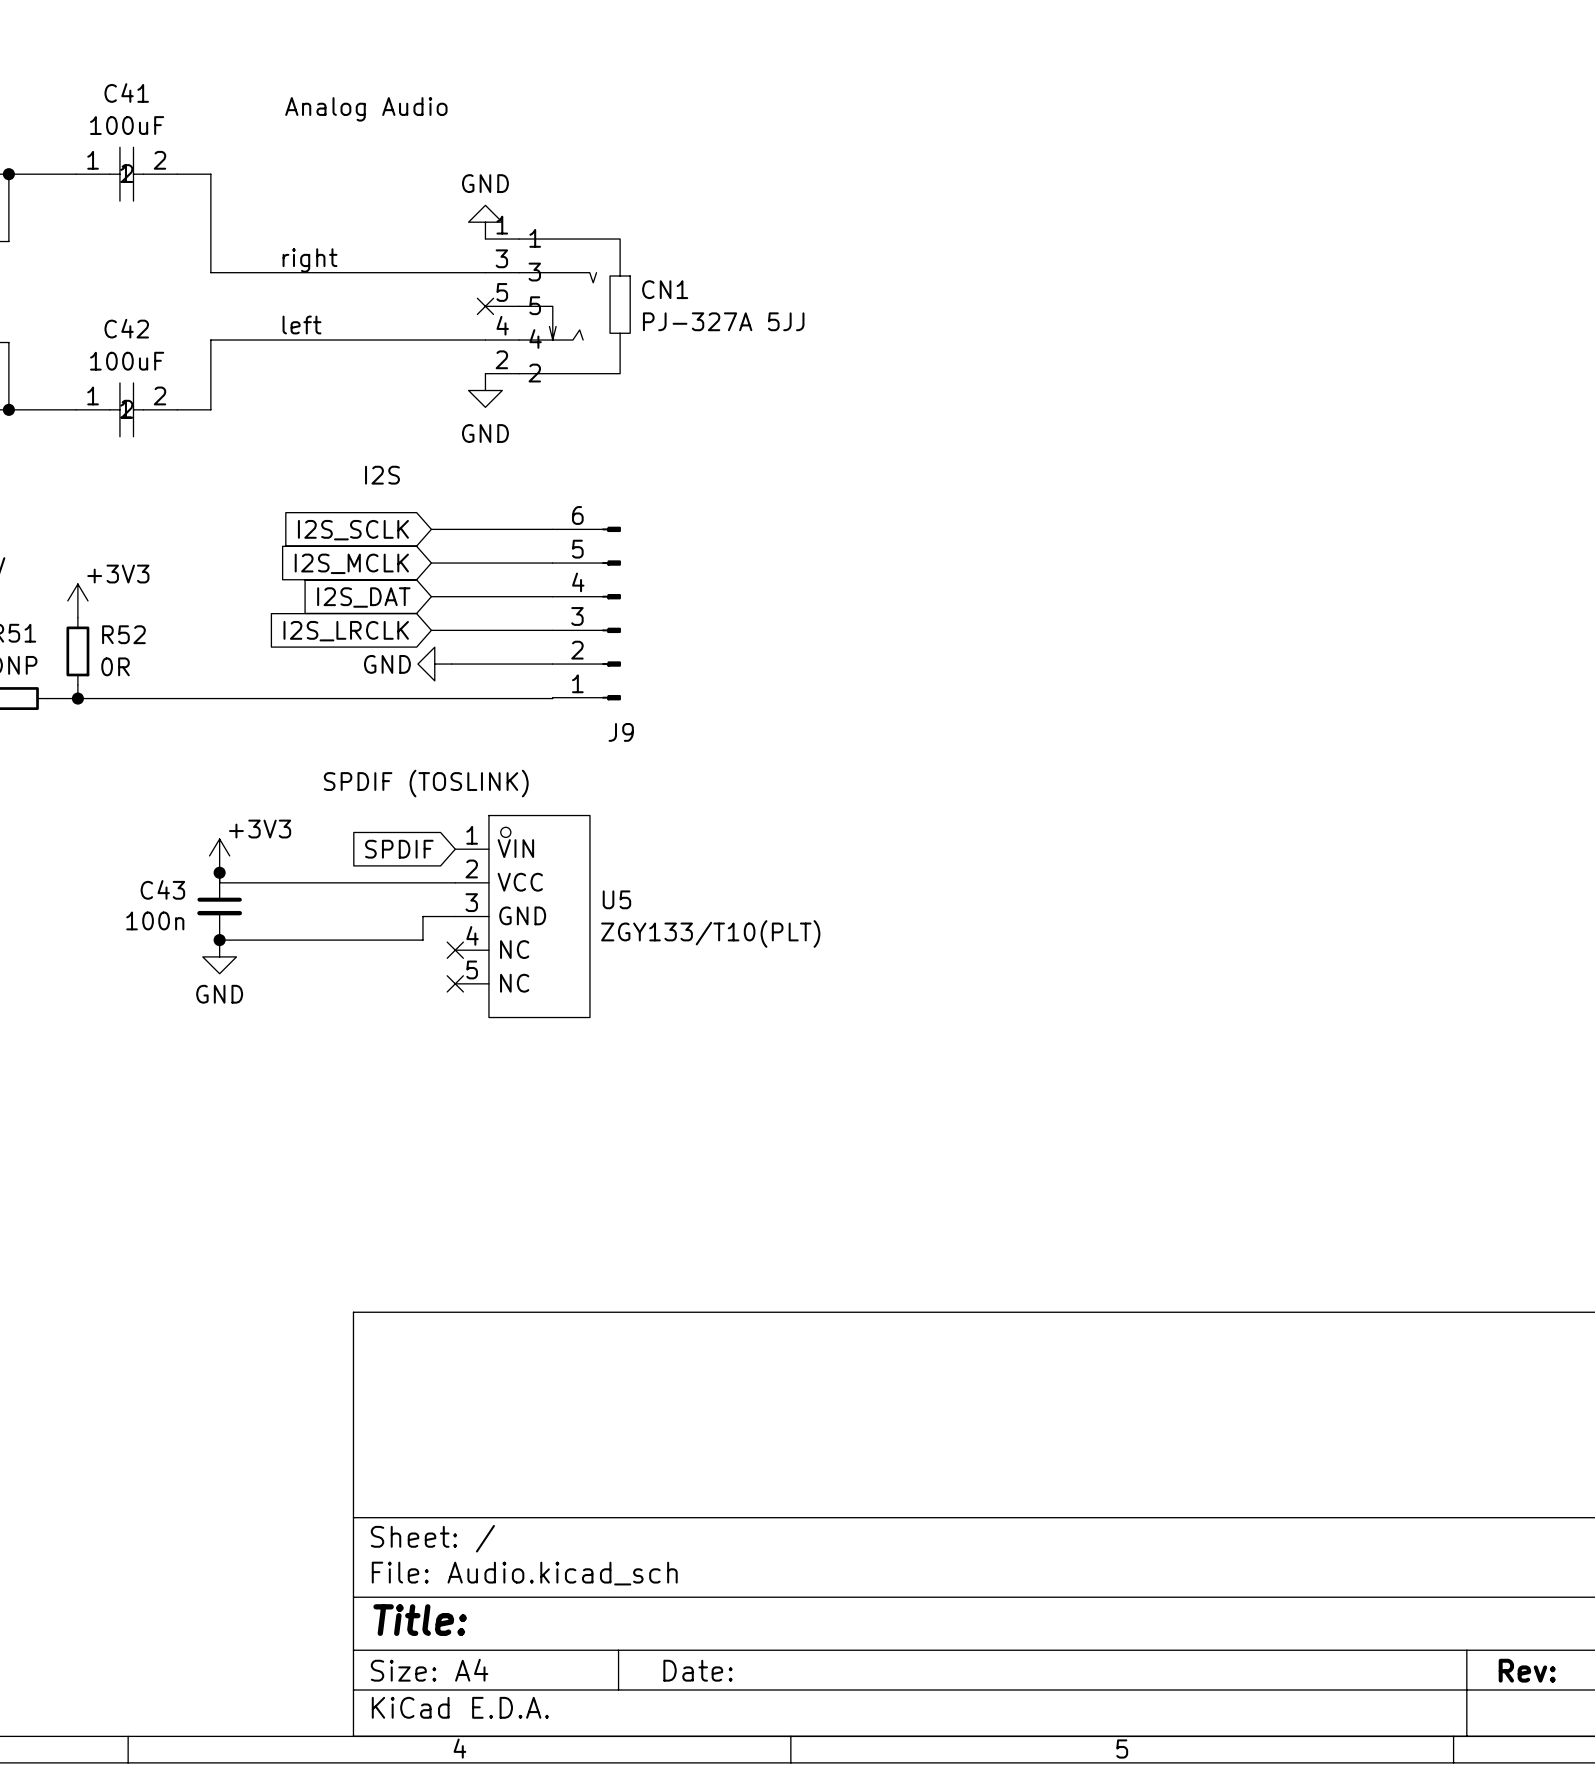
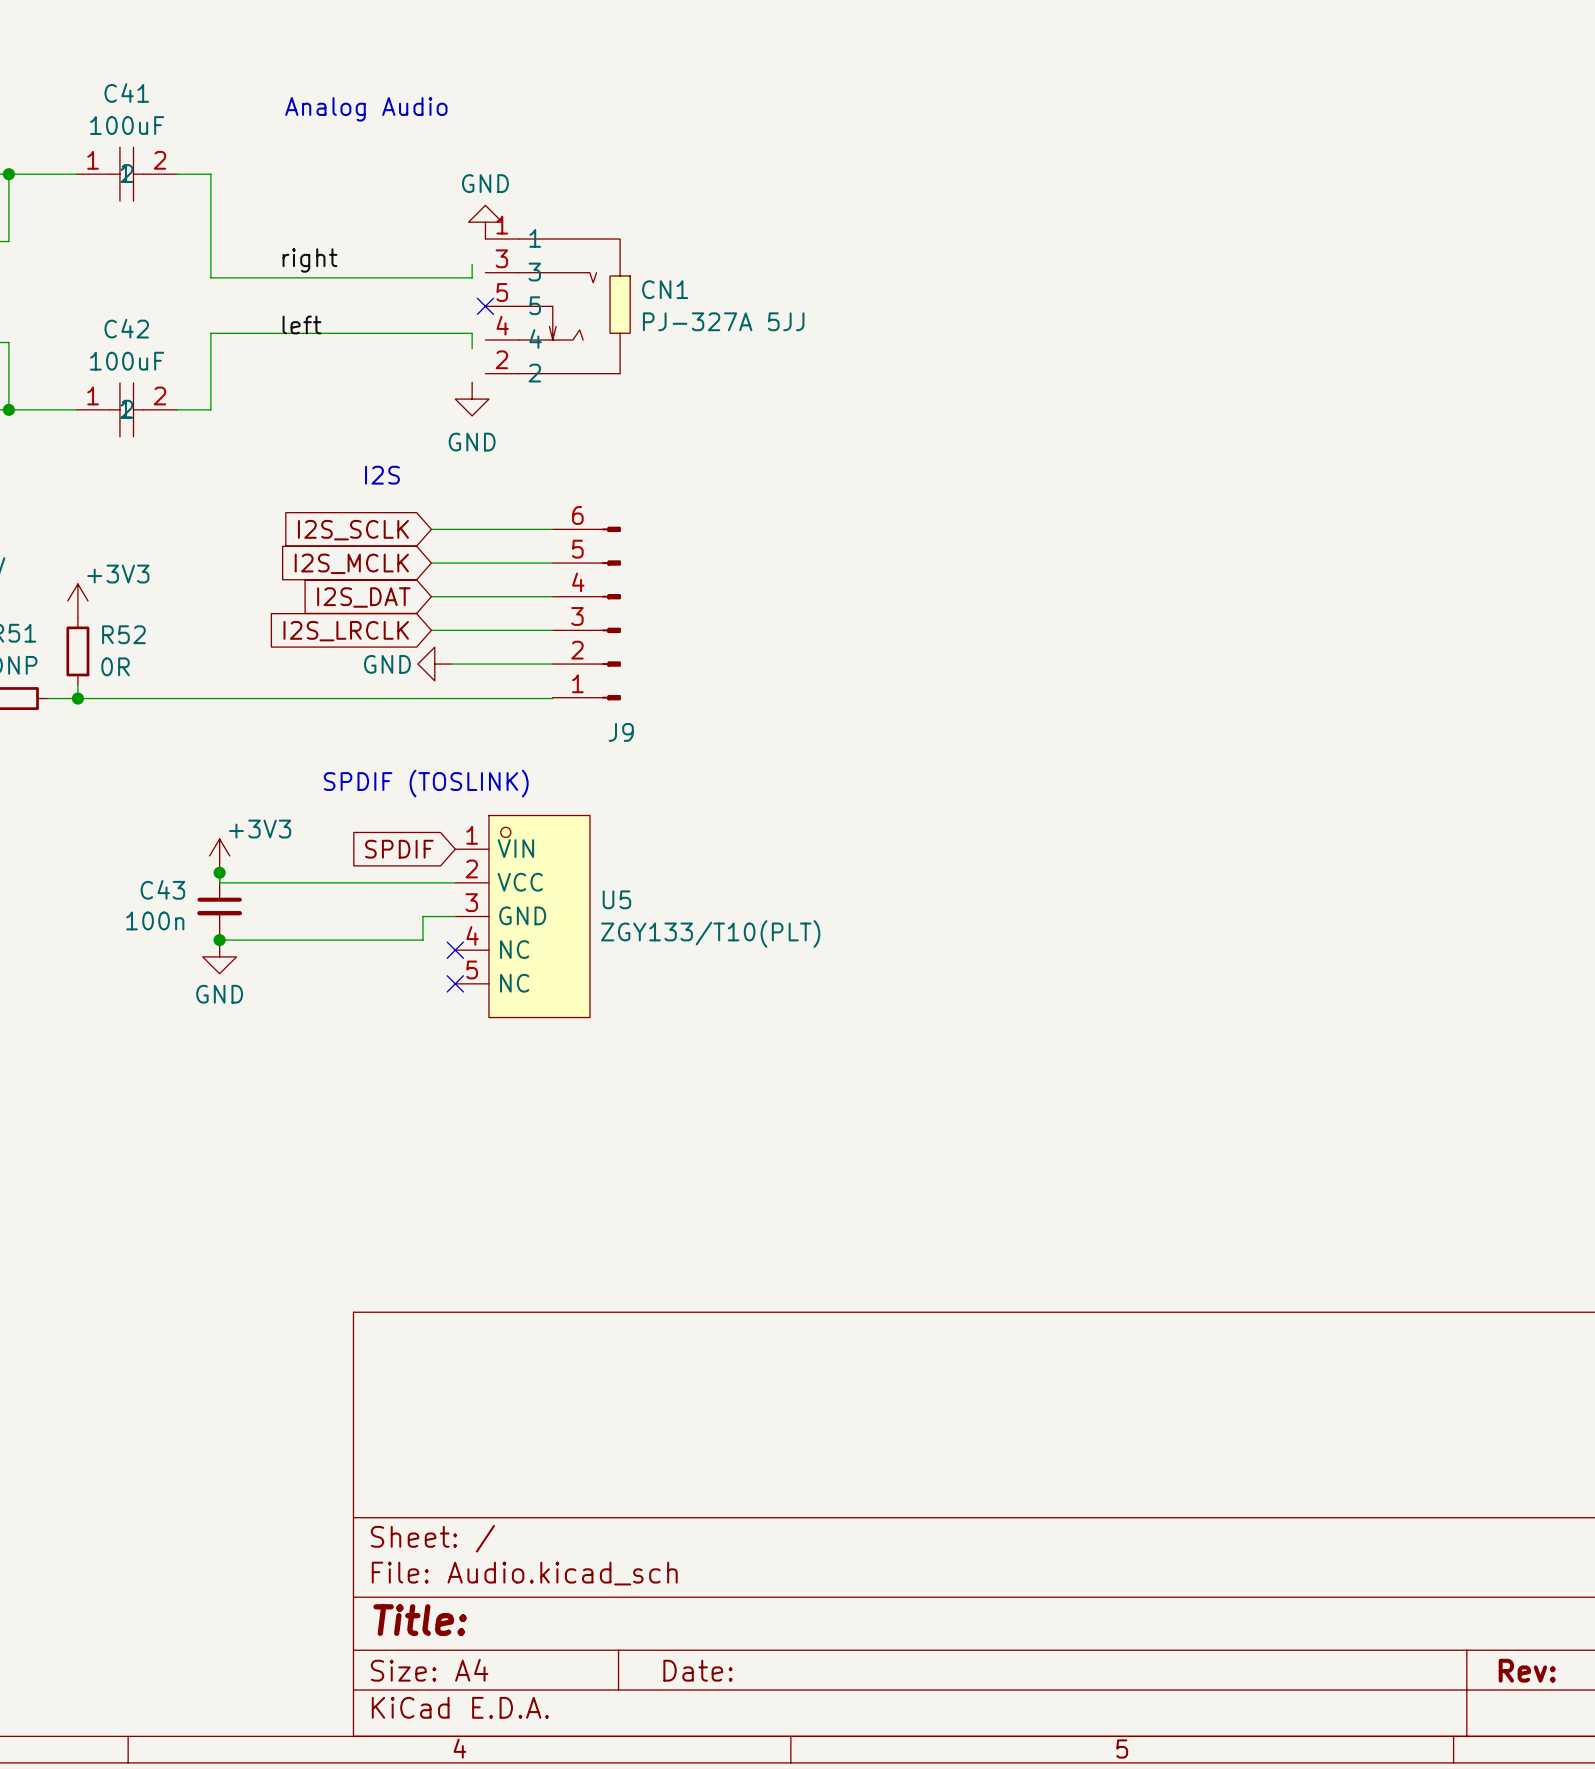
wire: (210, 272) (485, 272) -> (210, 272) (210, 277) (472, 277) (472, 264)
wire: (210, 340) (485, 340) -> (210, 340) (210, 333) (472, 333) (472, 348)
power symbol position: GND (485, 390) -> GND (472, 399)

